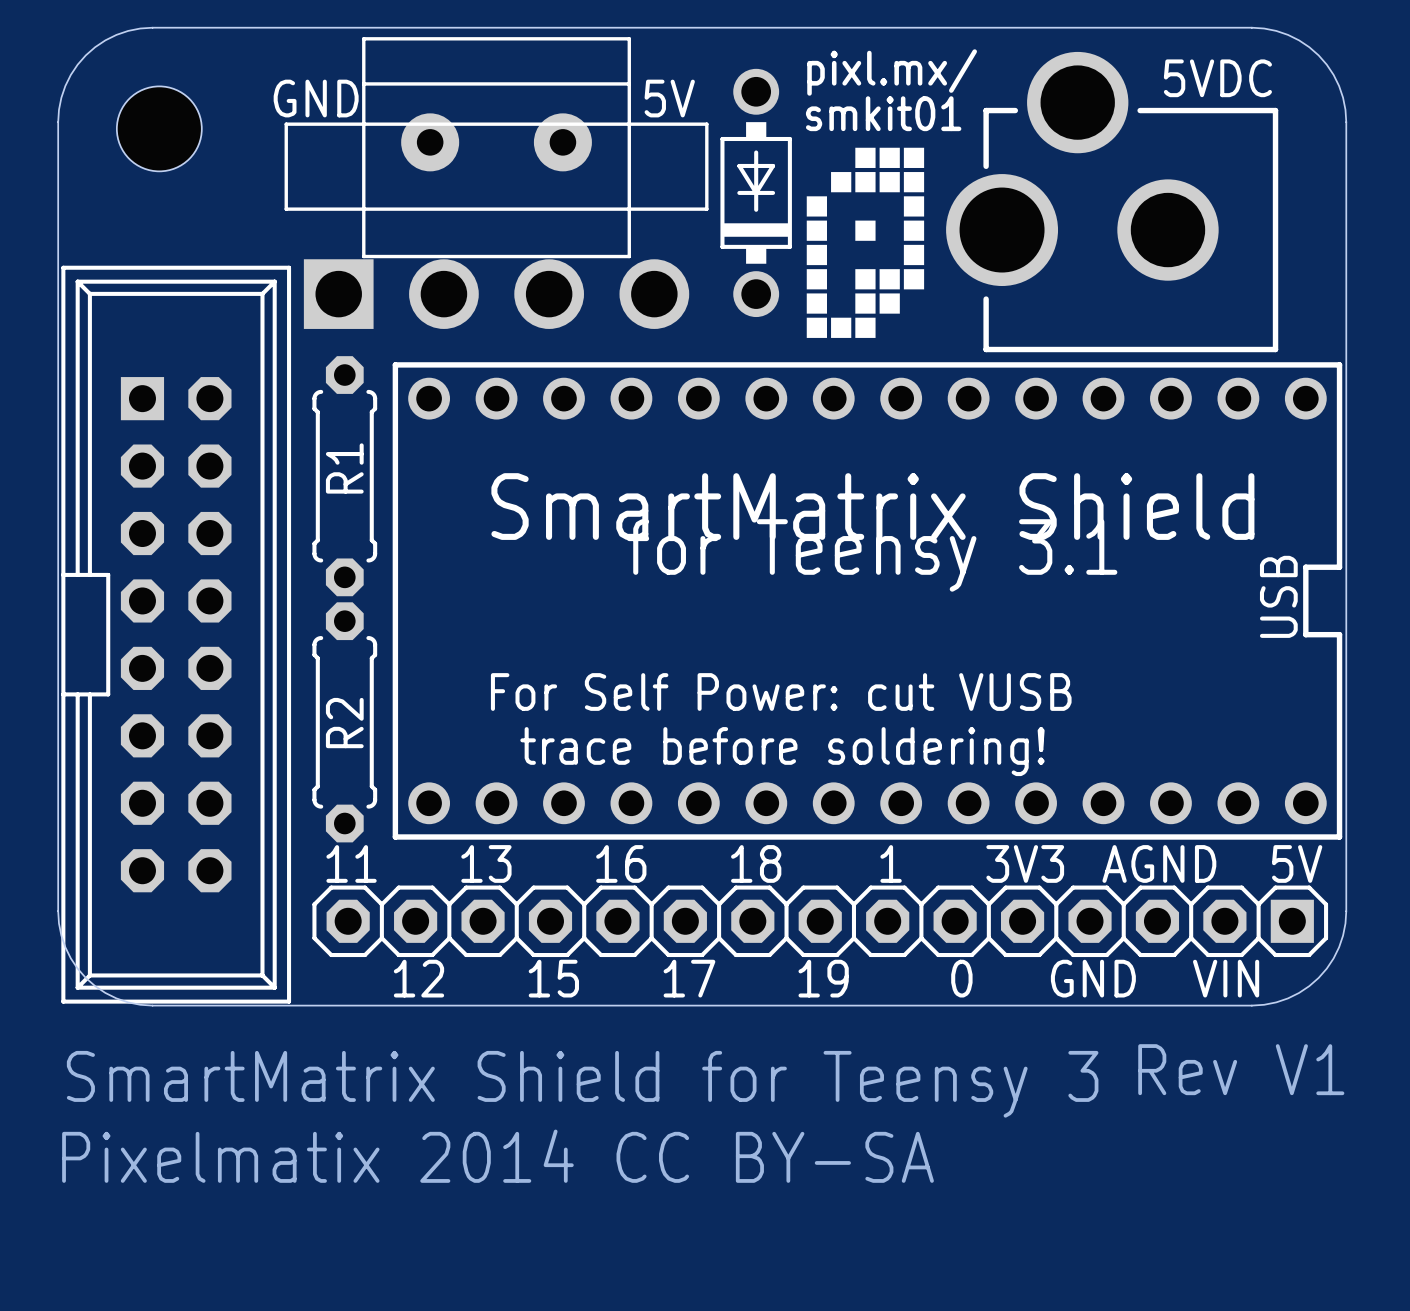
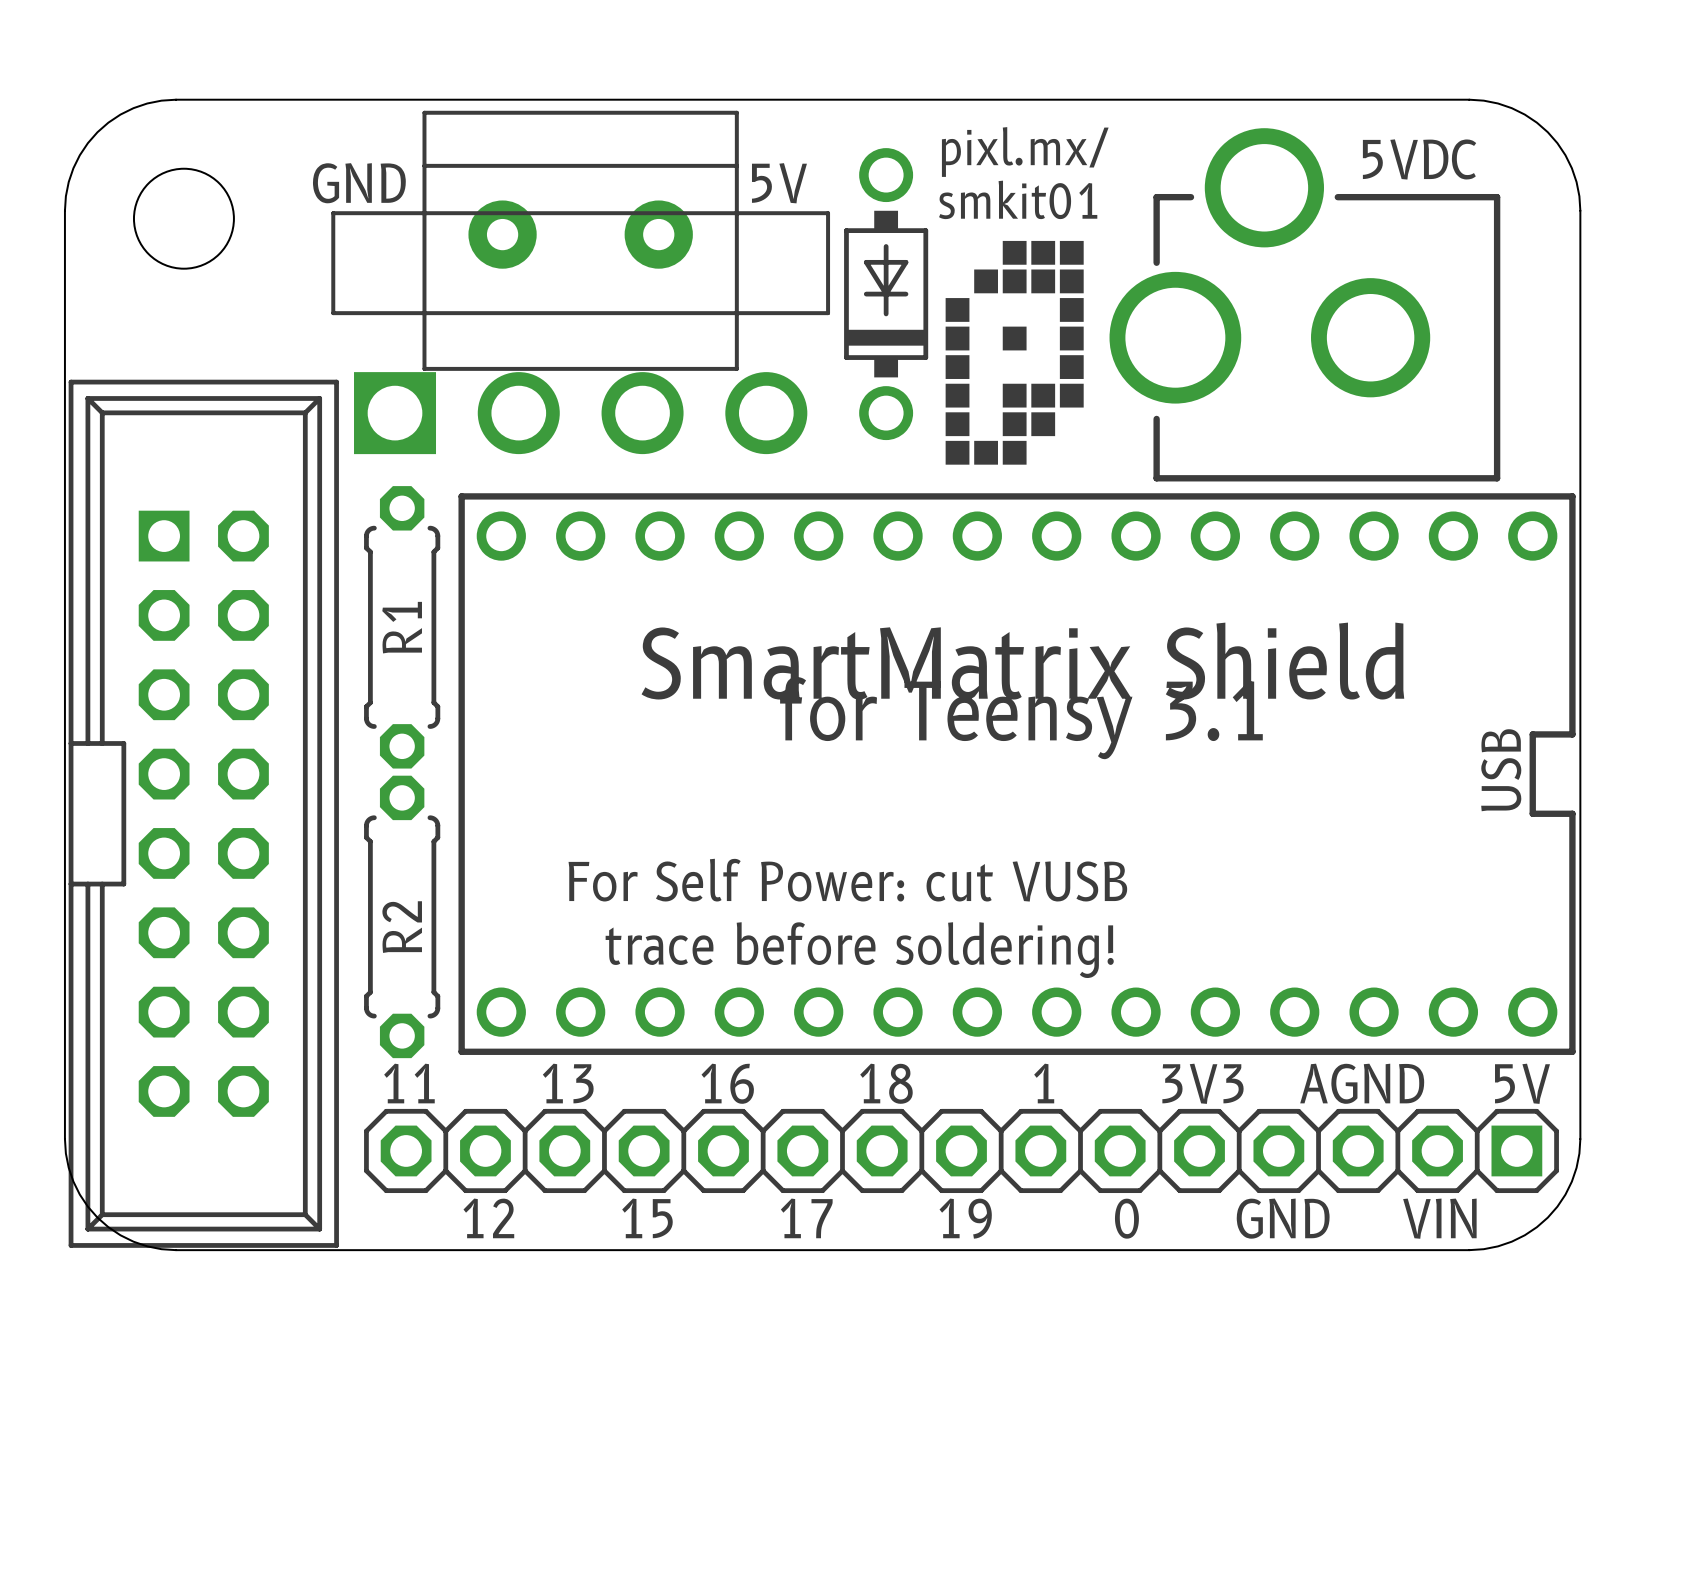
text: Rev V1 (1241, 1069) -> none
text: SmartMatrix Shield for Teensy 3 (582, 1084) -> none
text: Pixelmatix 2014 CC BY-SA (498, 1156) -> none

